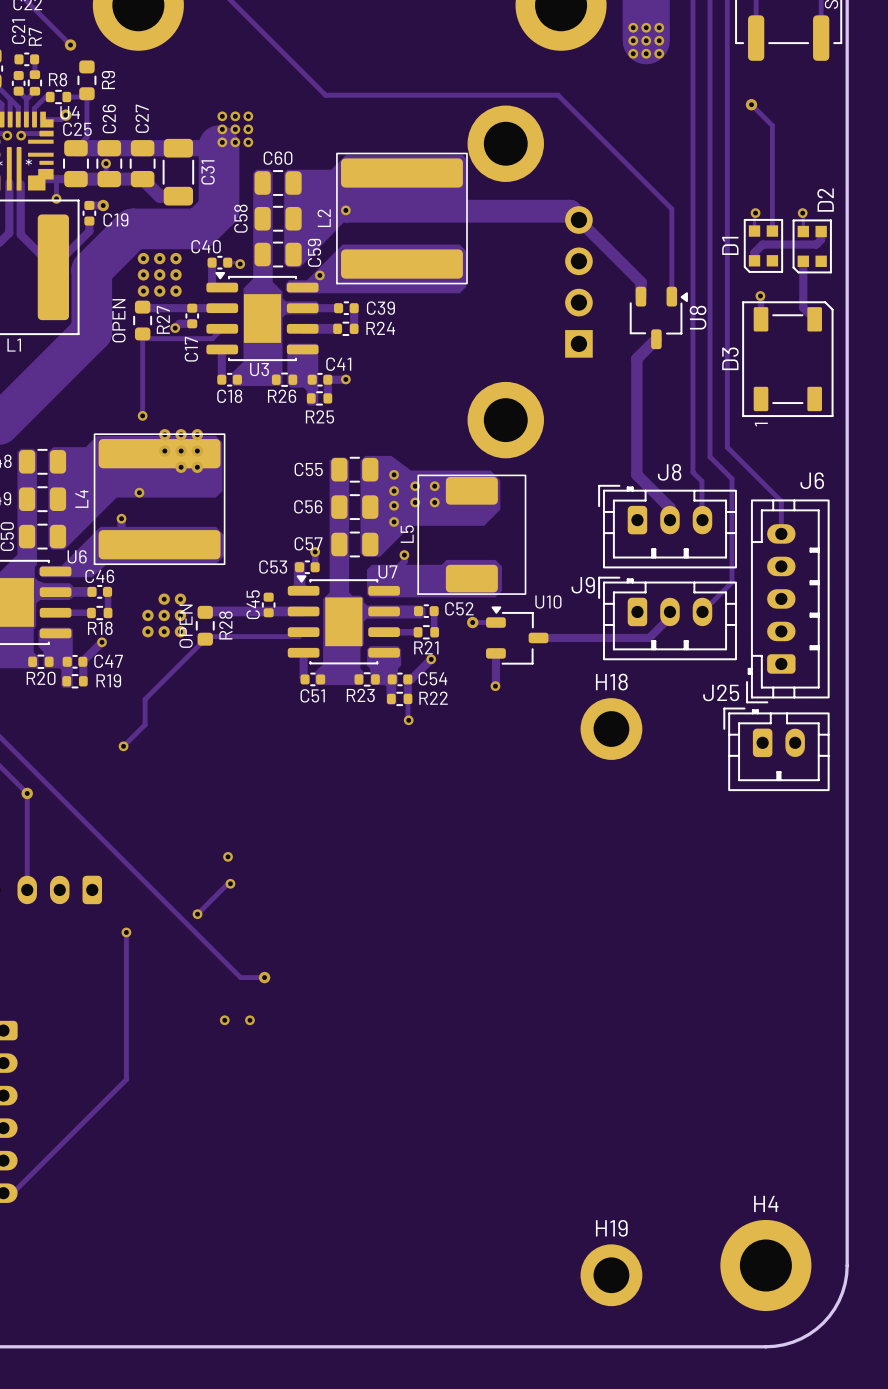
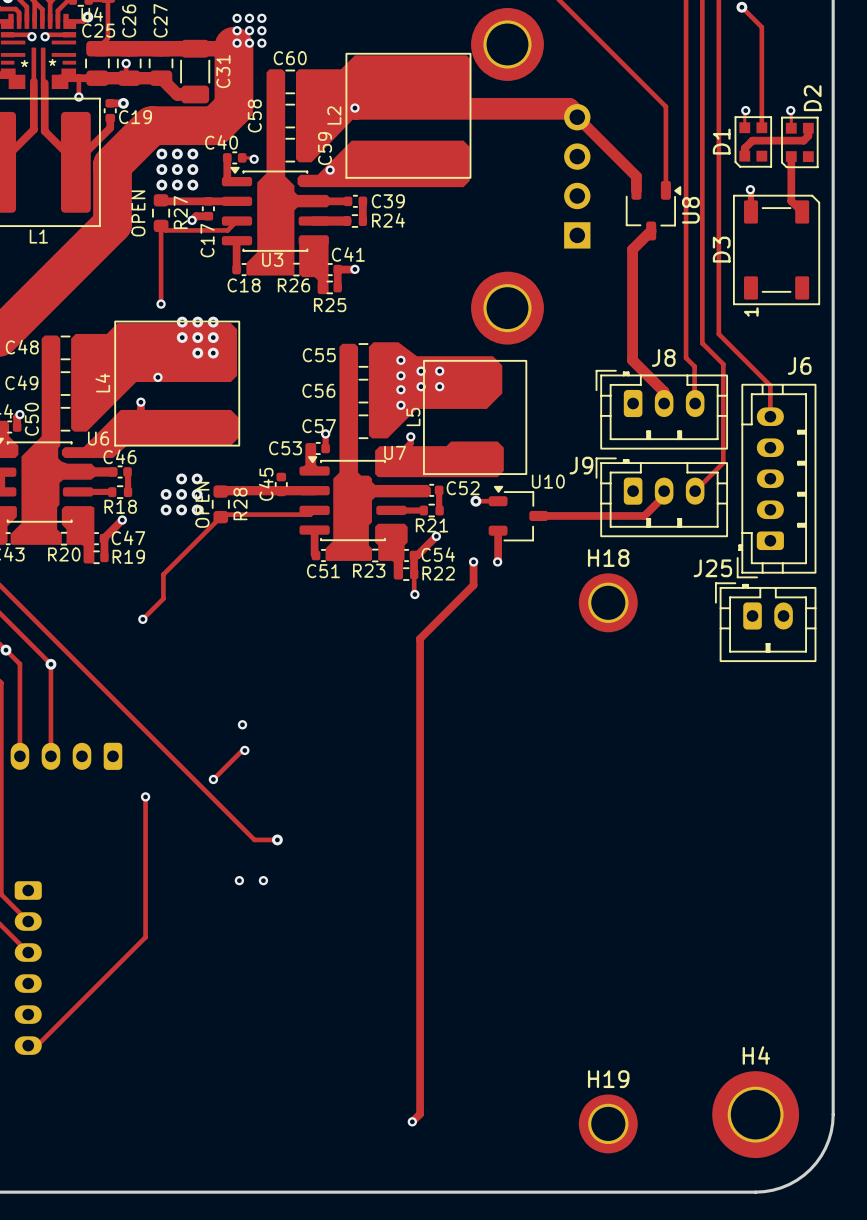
track: none -> (473, 561) (473, 585) (420, 638) (420, 1114) (412, 1121)
via: none -> (473, 561)
via: none -> (412, 1121)

